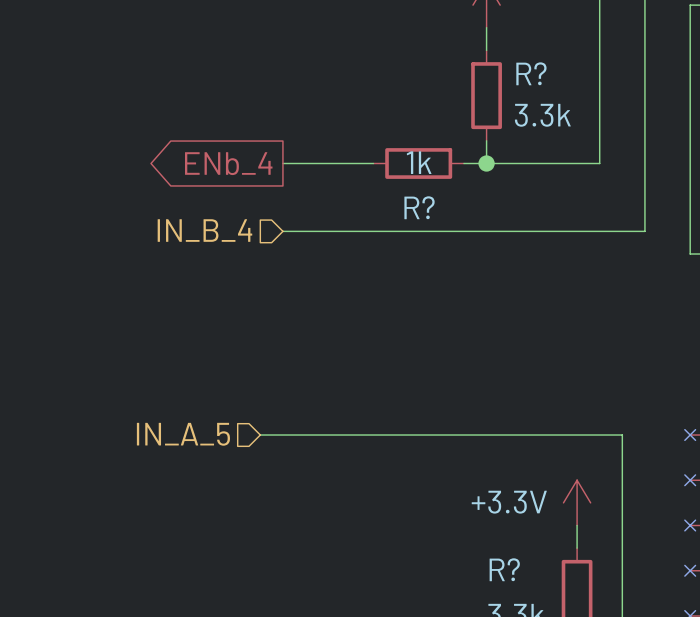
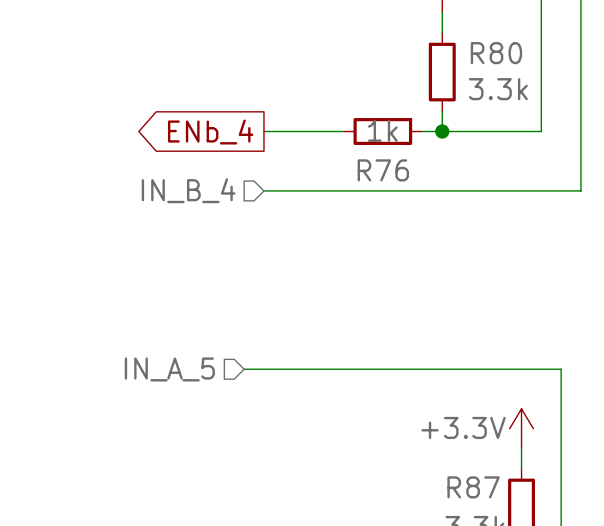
R? name: R? (531, 73) -> R80 (496, 53)
R? name: R? (419, 207) -> R76 (383, 170)
R? name: R? (504, 569) -> R87 (473, 487)

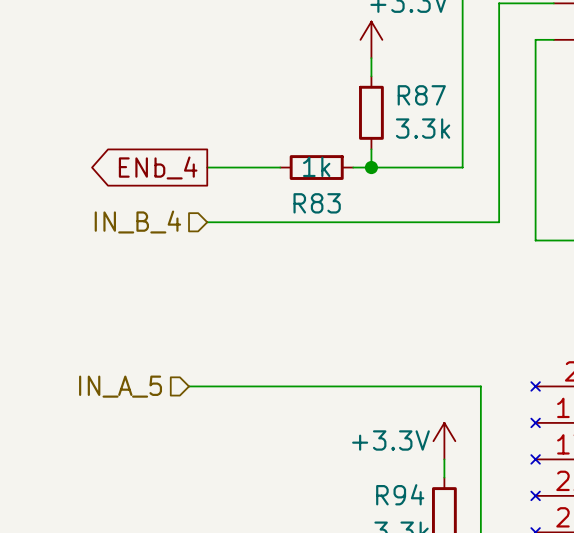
R80 name: R80 (496, 53) -> R87 (421, 95)
R76 name: R76 (383, 170) -> R83 (317, 203)
R87 name: R87 (473, 487) -> R94 (400, 494)

